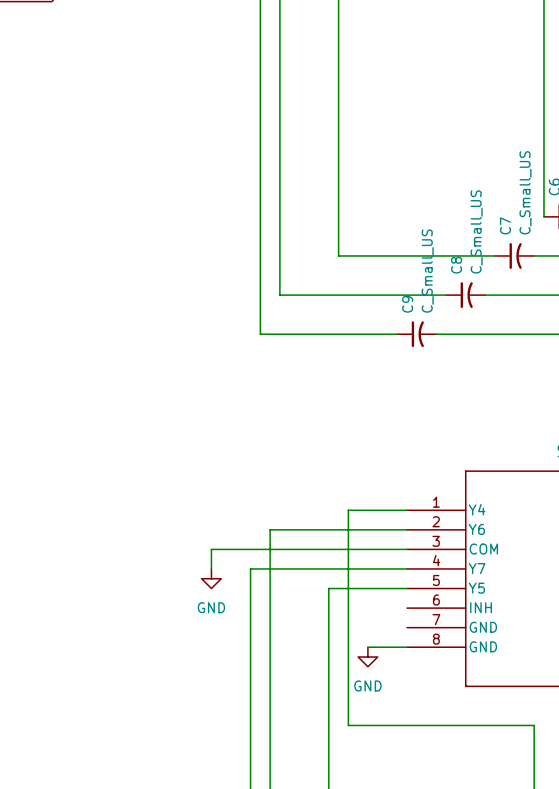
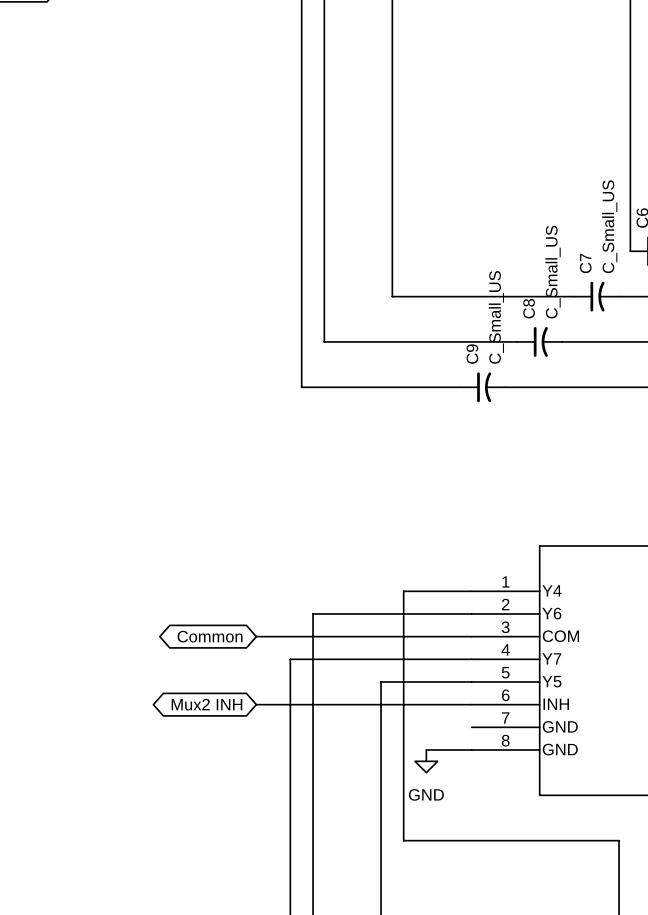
global label: none -> Common (210, 636)
wire: (221, 549) (211, 549) (211, 568) -> none
power symbol: GND (211, 578) -> none
global label: none -> Mux2 INH (206, 704)
wire: none -> (256, 704) (471, 704)

